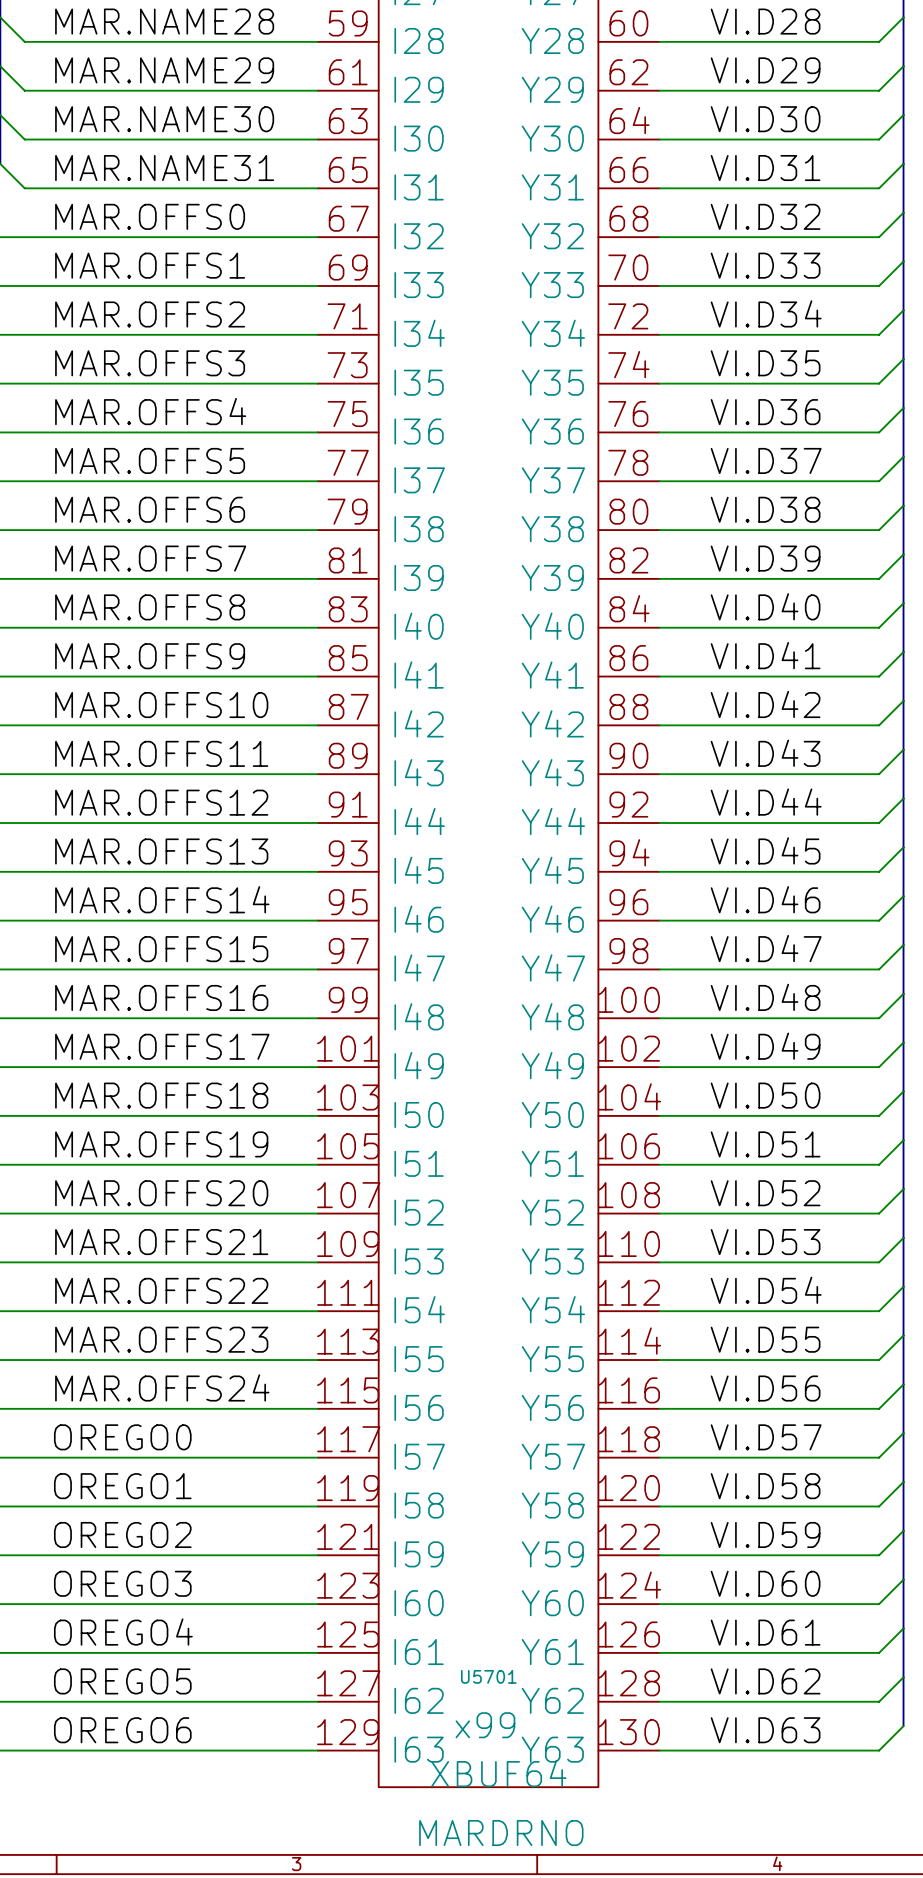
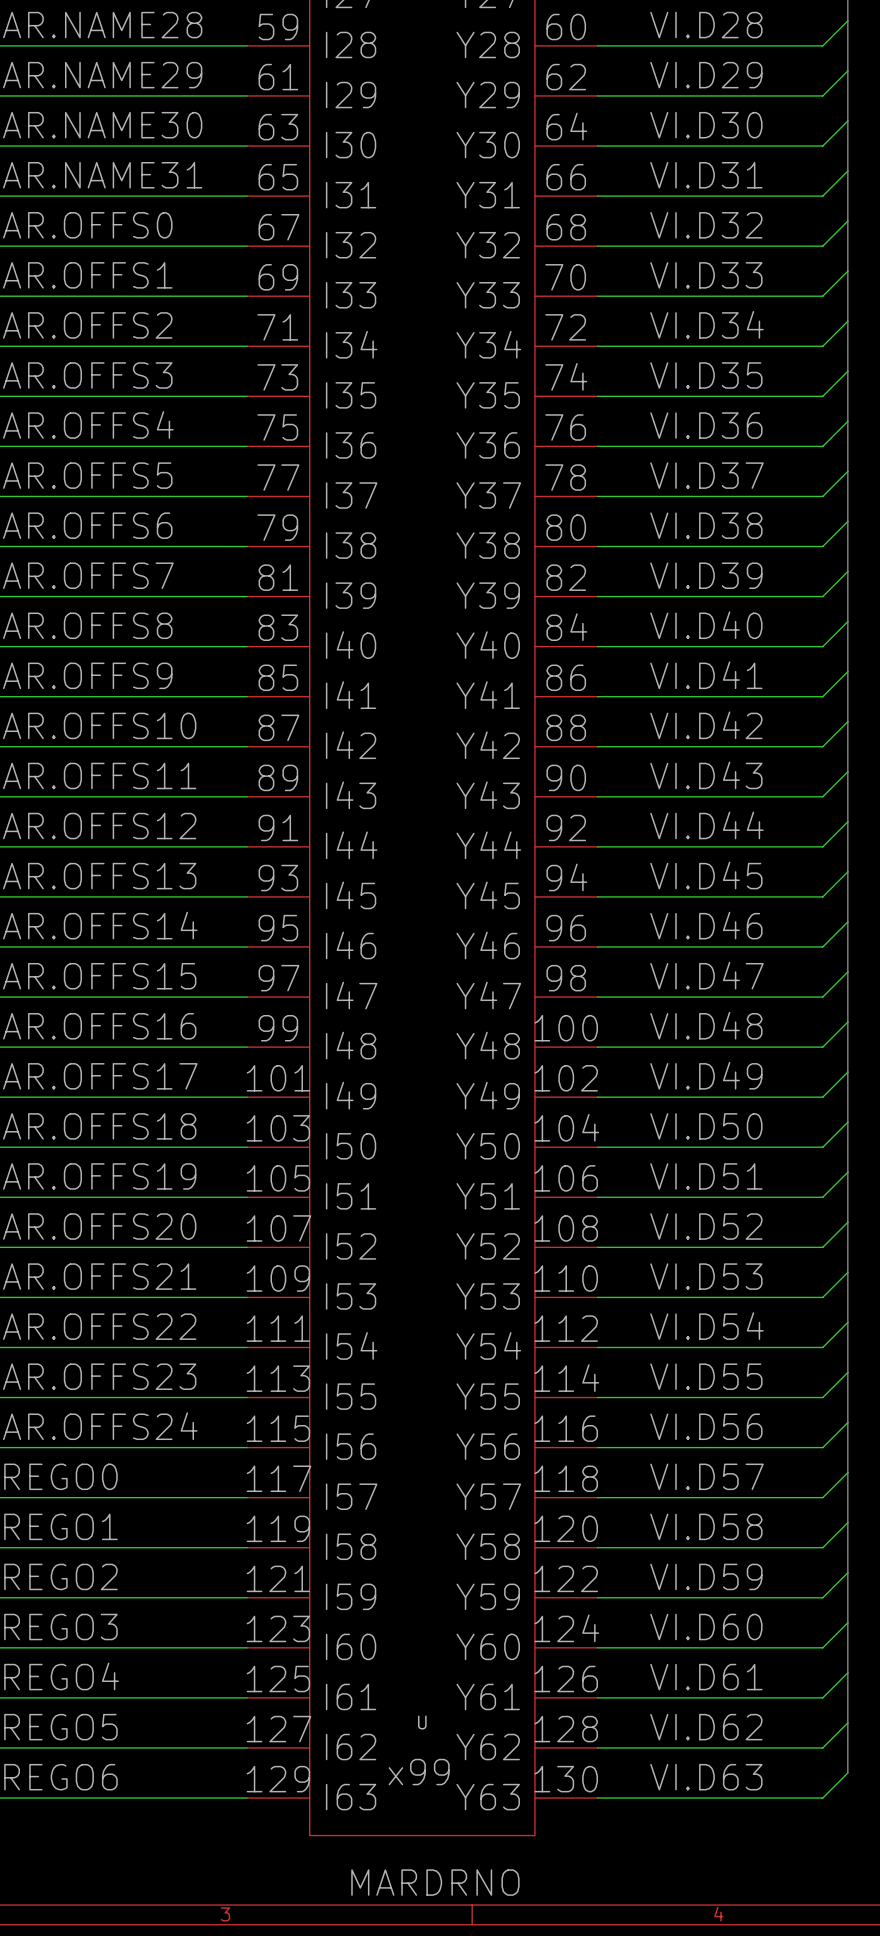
U5701 name: U5701 (488, 1676) -> U (422, 1722)
U5701 value: XBUF64 (498, 1773) -> none

